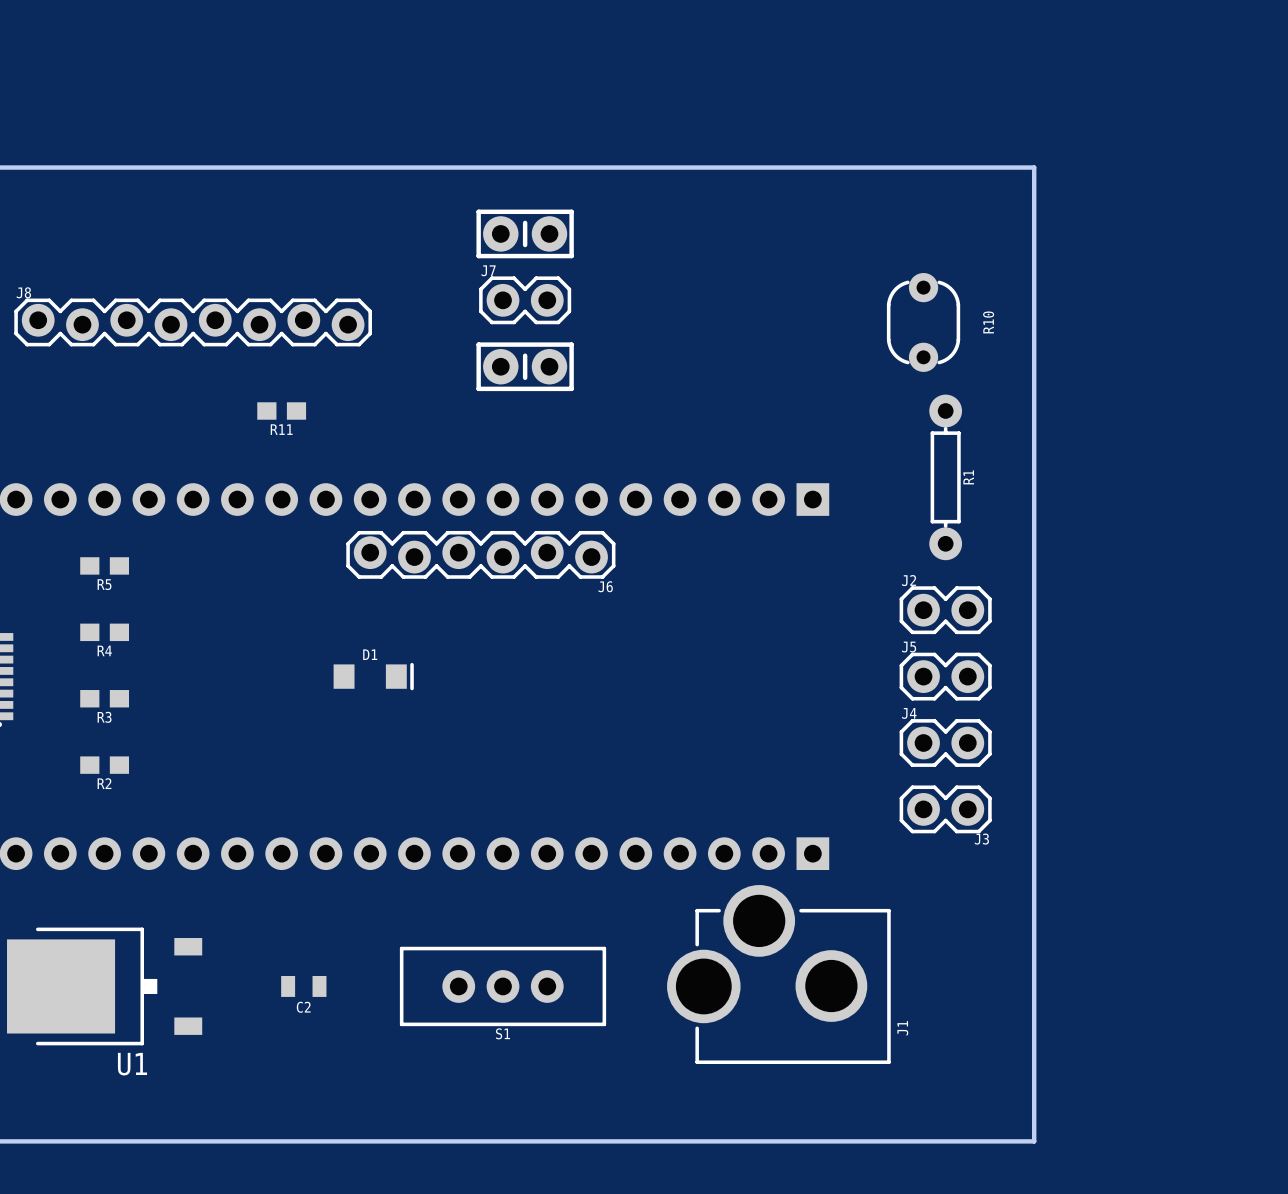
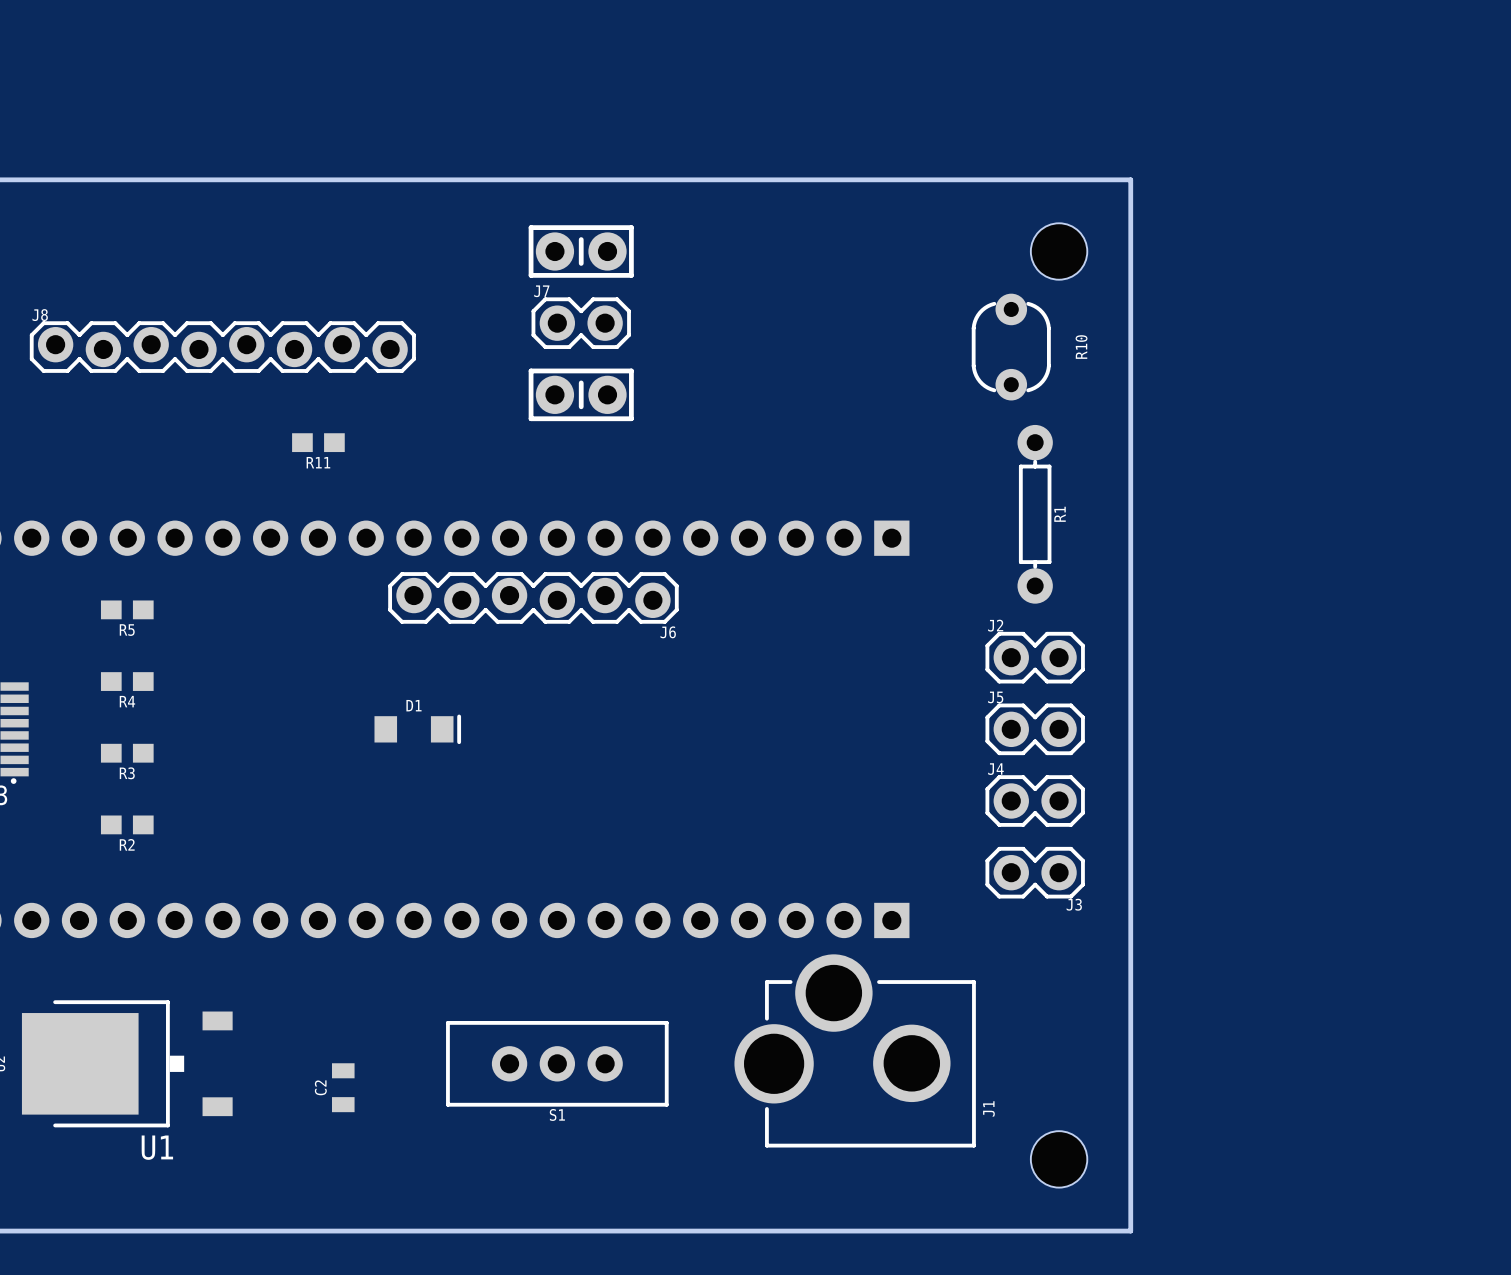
hole: none -> (1059, 251)
C2 rotation: 0° (303, 986) -> 90° clockwise (343, 1087)
hole: none -> (1059, 1159)

